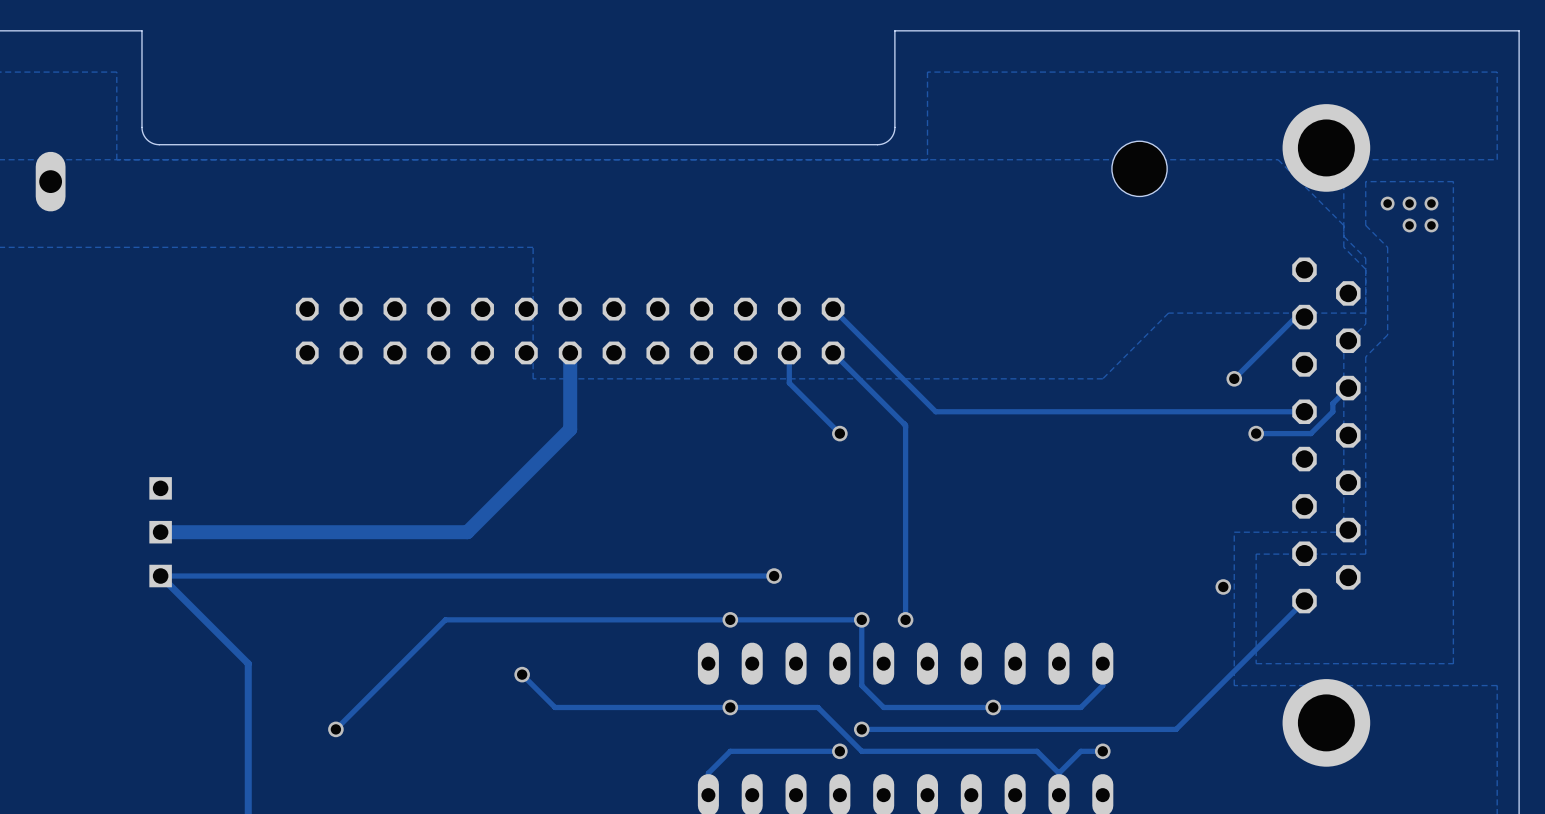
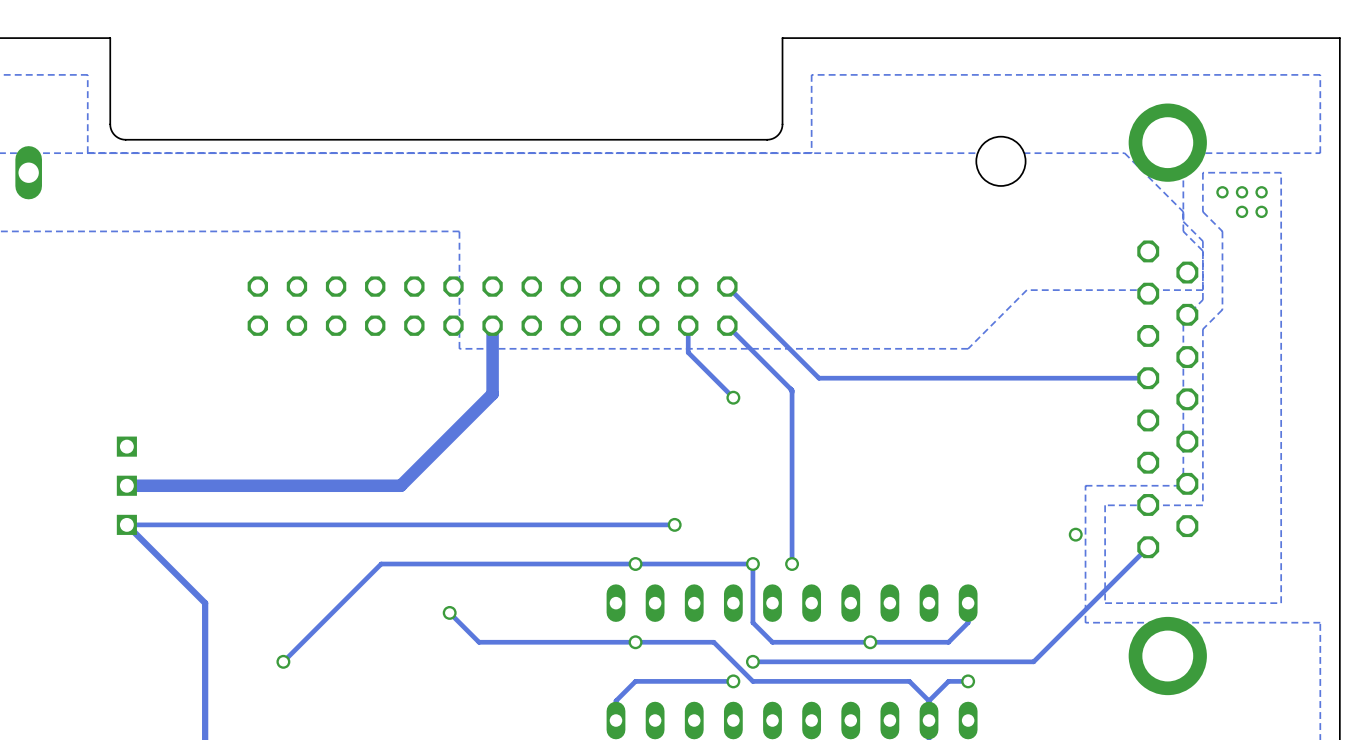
track: (1304, 317) (1295, 317) (1234, 378) -> none
via: (1234, 378) -> none
track: (1348, 388) (1332, 403) (1332, 411) (1310, 433) (1256, 433) -> none
via: (1256, 433) -> none

